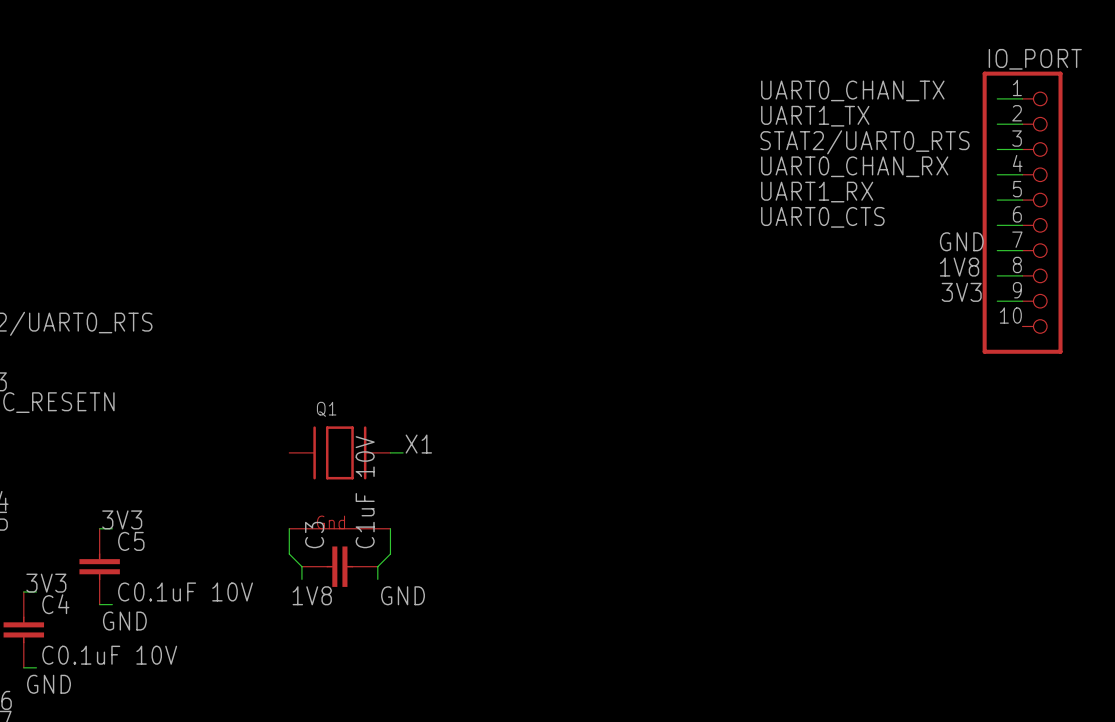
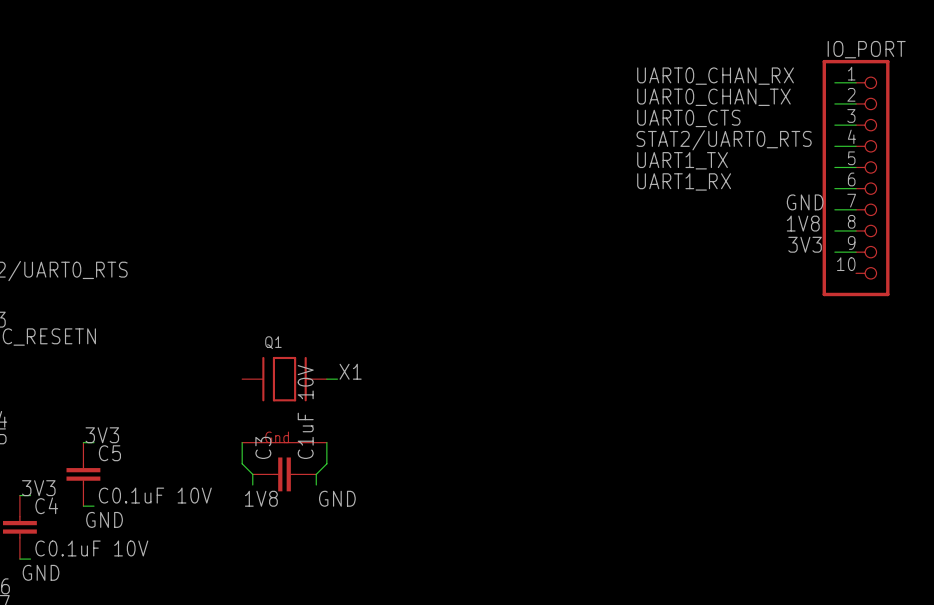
label: UART0_CHAN_TX (852, 90) -> UART0_CHAN_RX (715, 76)
label: UART1_TX (815, 116) -> UART0_CHAN_TX (713, 97)
label: STAT2/UART0_RTS (864, 142) -> UART0_CTS (688, 118)
label: UART0_CHAN_RX (854, 166) -> STAT2/UART0_RTS (724, 140)
label: UART1_RX (817, 192) -> UART1_TX (682, 160)
label: UART0_CTS (822, 217) -> UART1_RX (684, 181)

